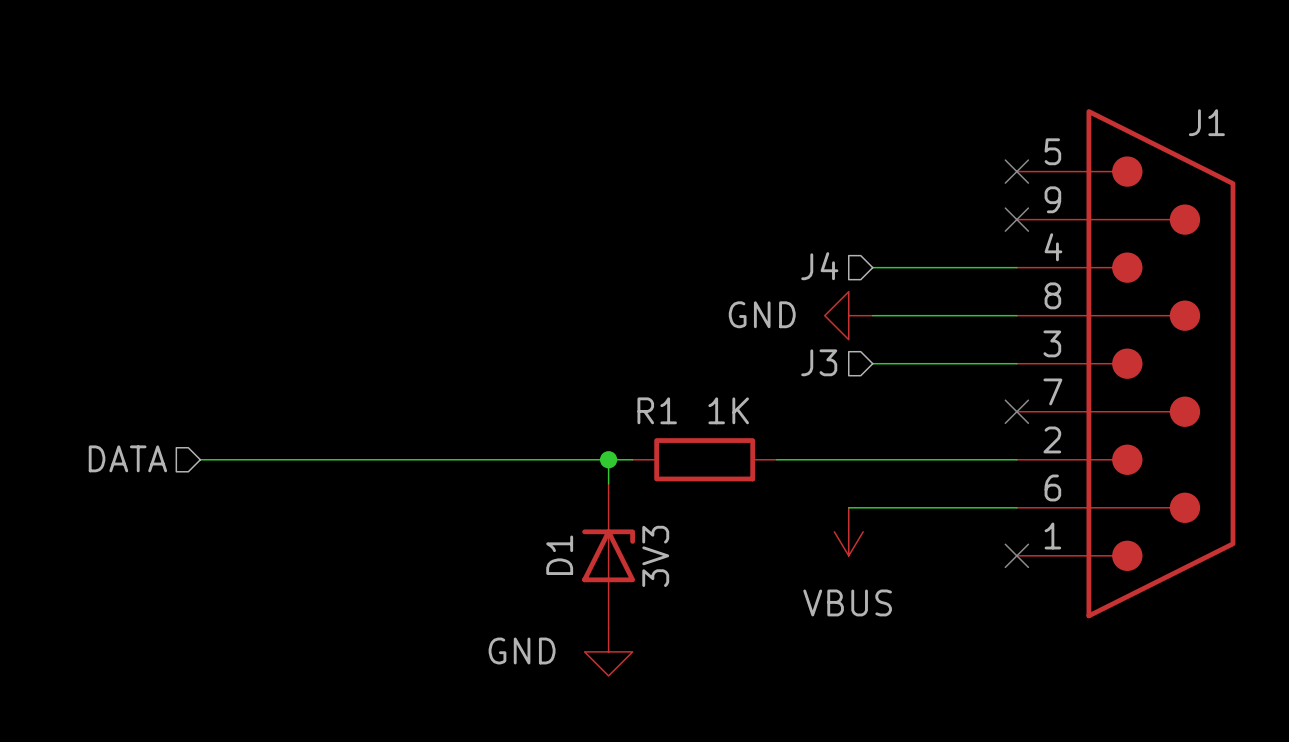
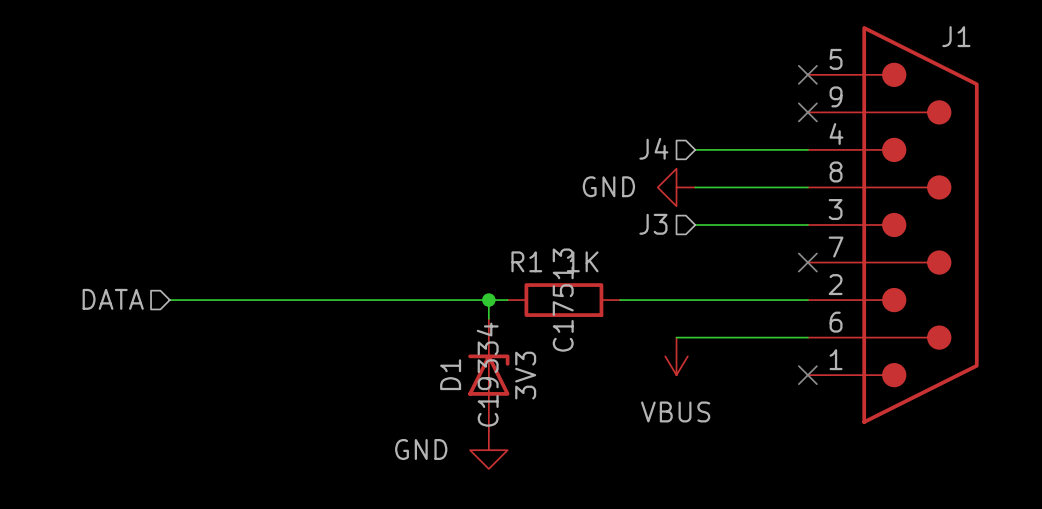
R1 text: none -> C17513 (563, 300)
D1 text: none -> C19334 (487, 374)

